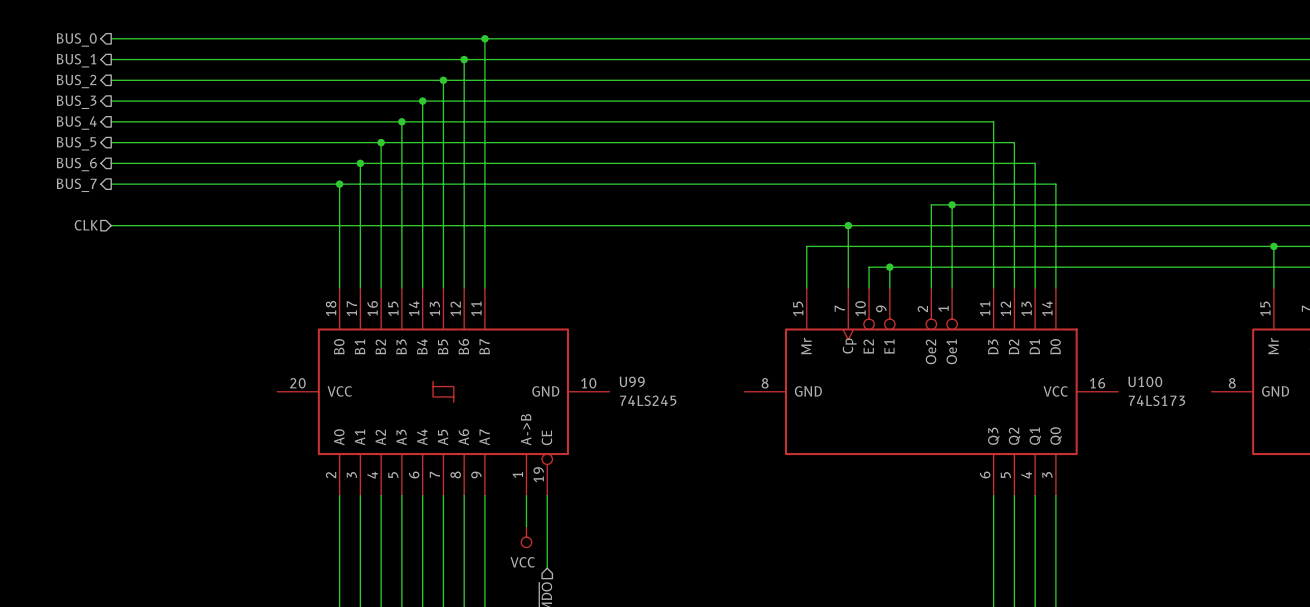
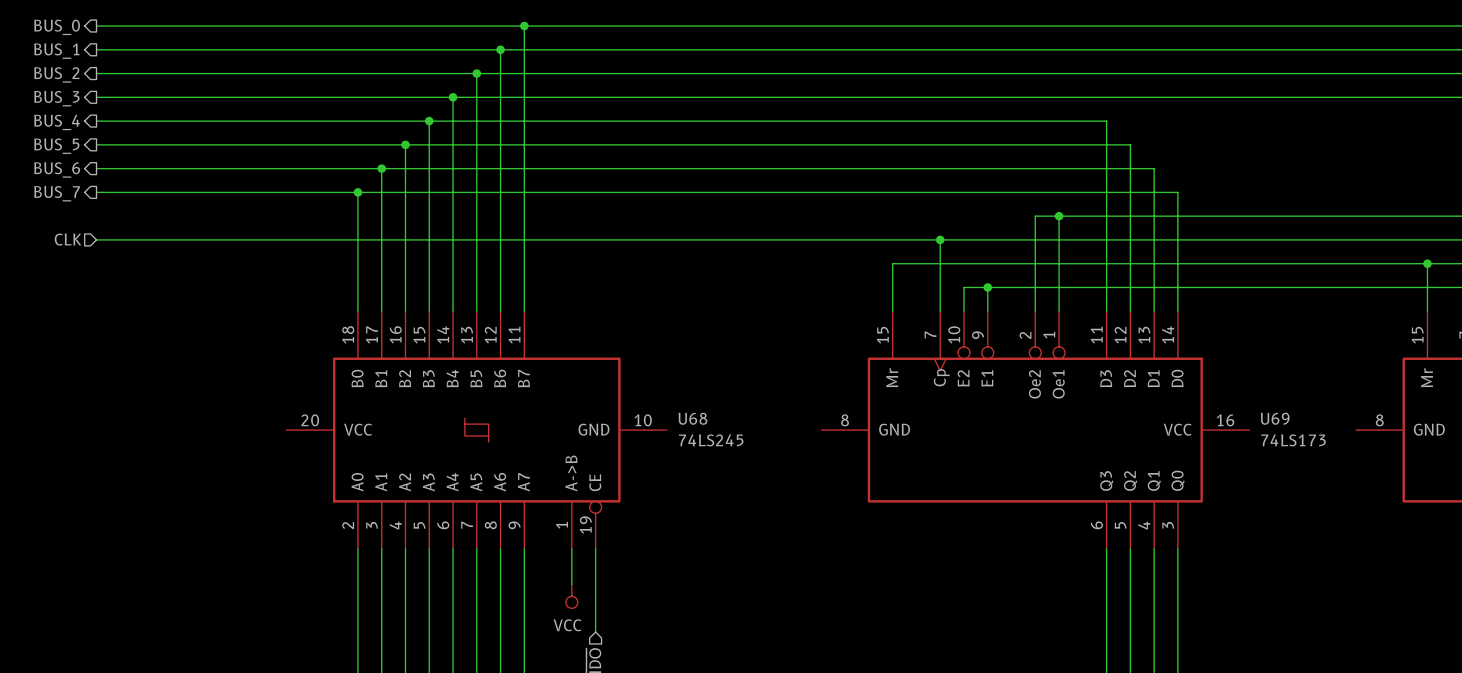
U99 name: U99 (632, 381) -> U68 (692, 418)
U100 name: U100 (1145, 381) -> U69 (1275, 418)

